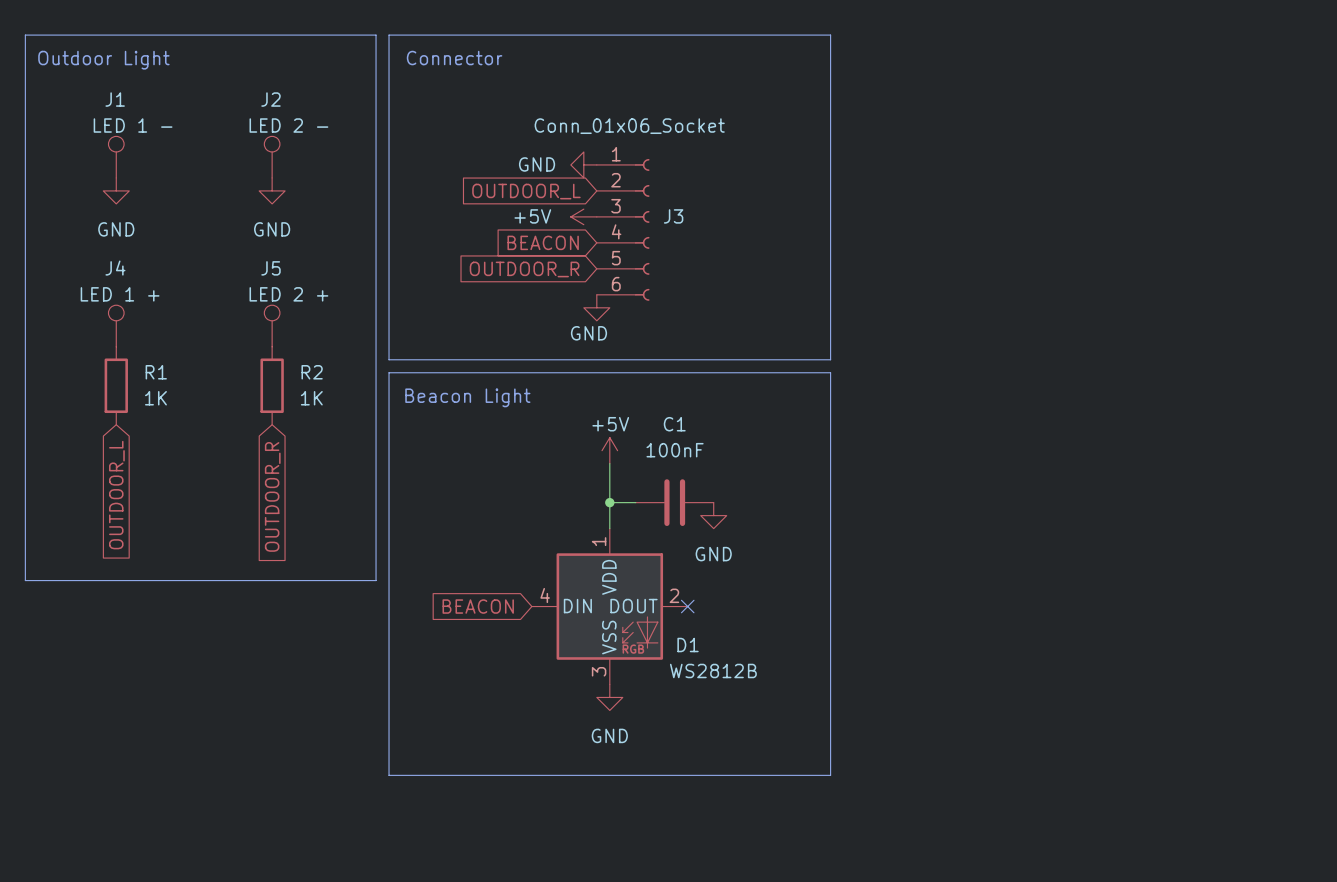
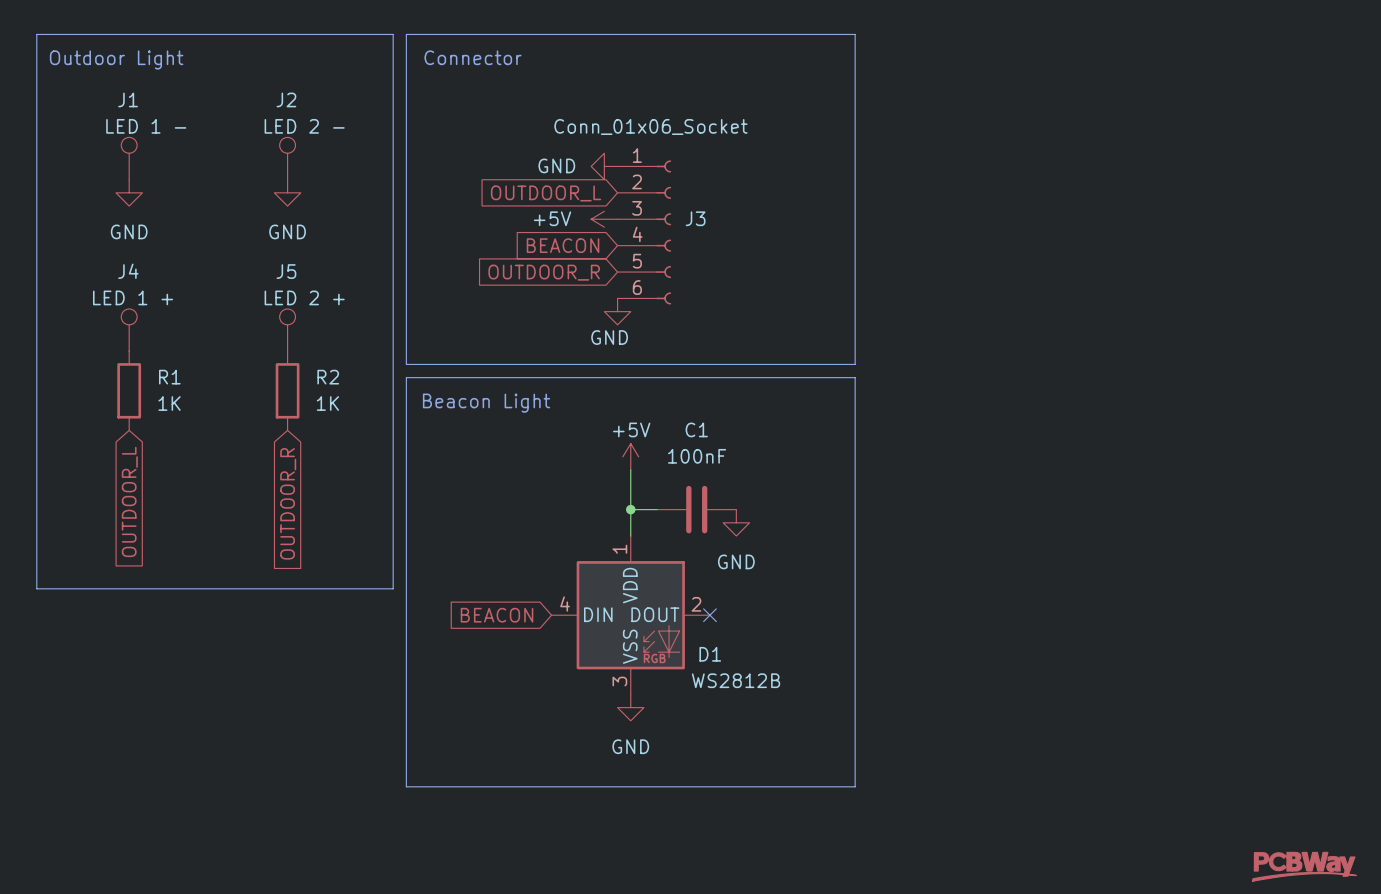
power symbol: none -> (1304, 866)

